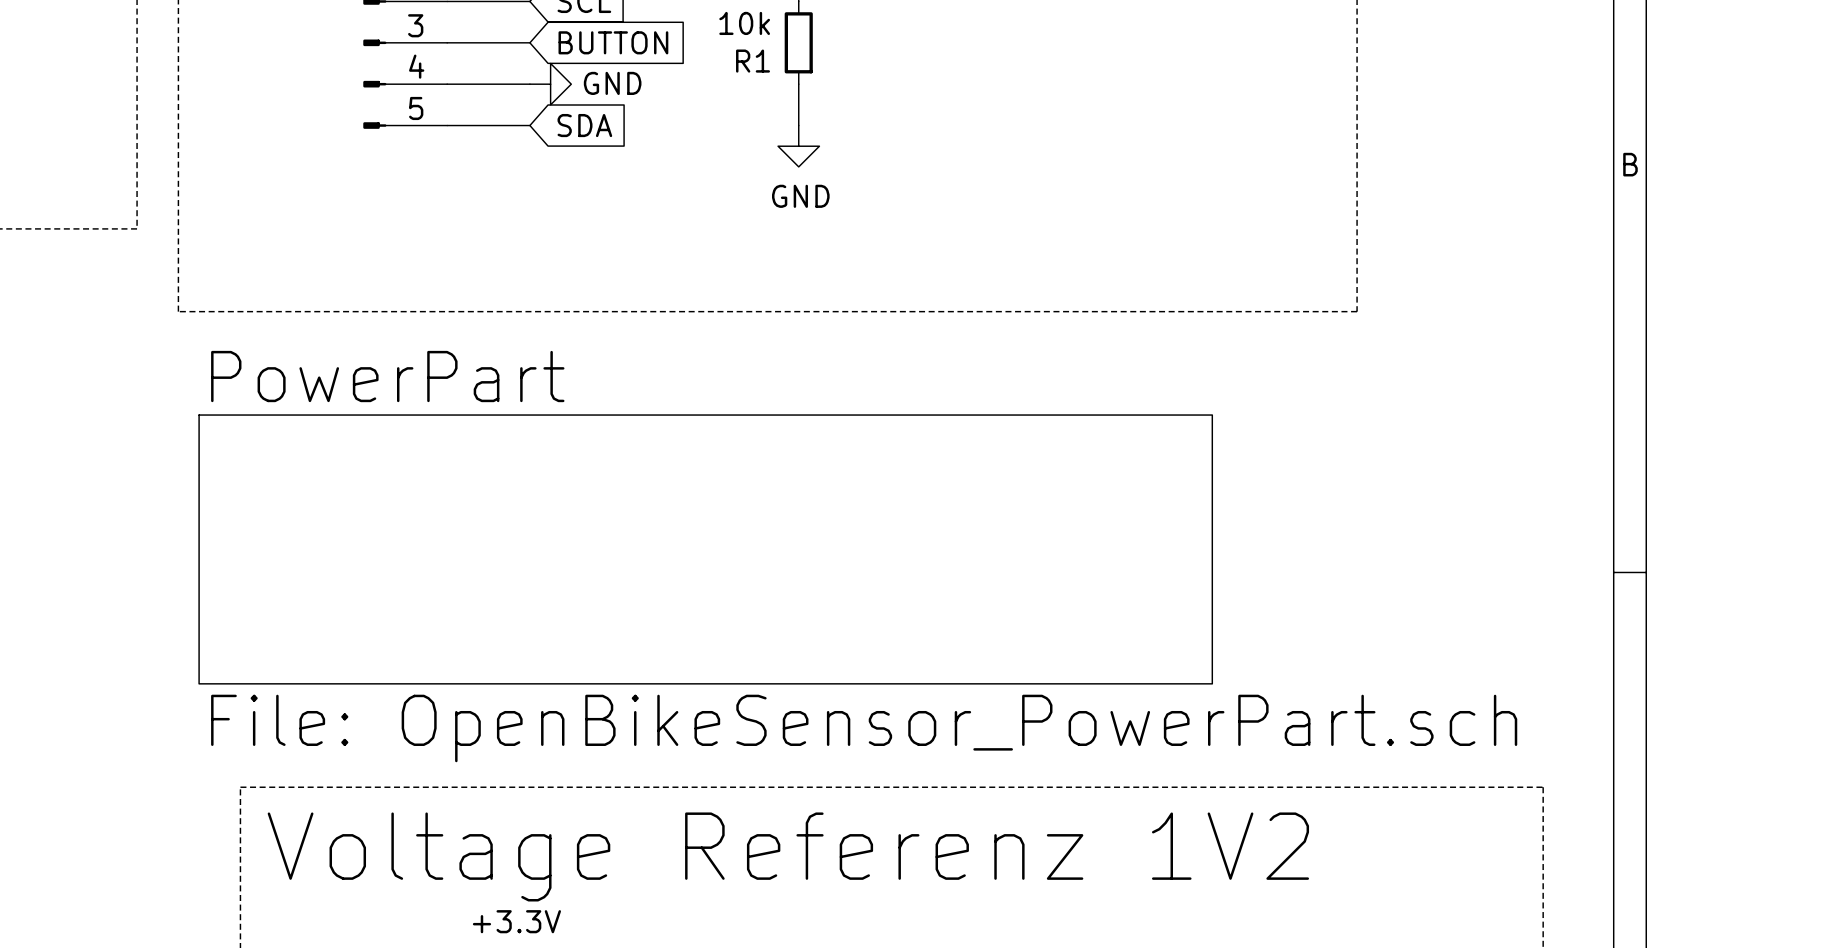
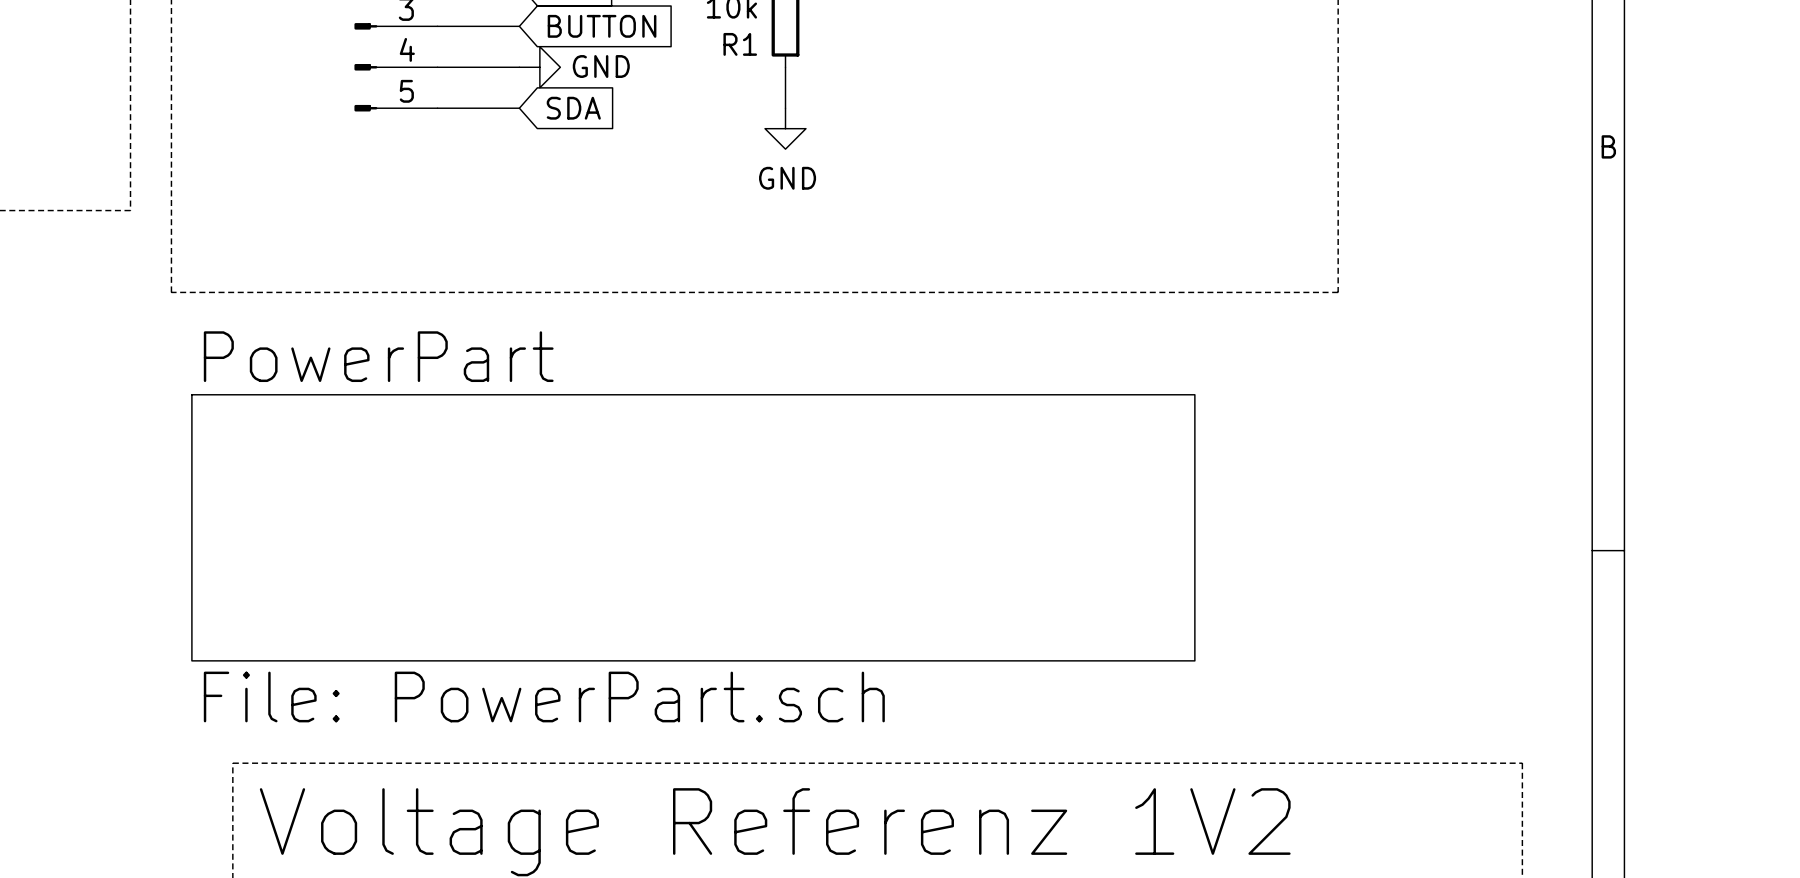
sheet PowerPart value: File: OpenBikeSensor_PowerPart.sch (864, 728) -> File: PowerPart.sch (544, 696)

